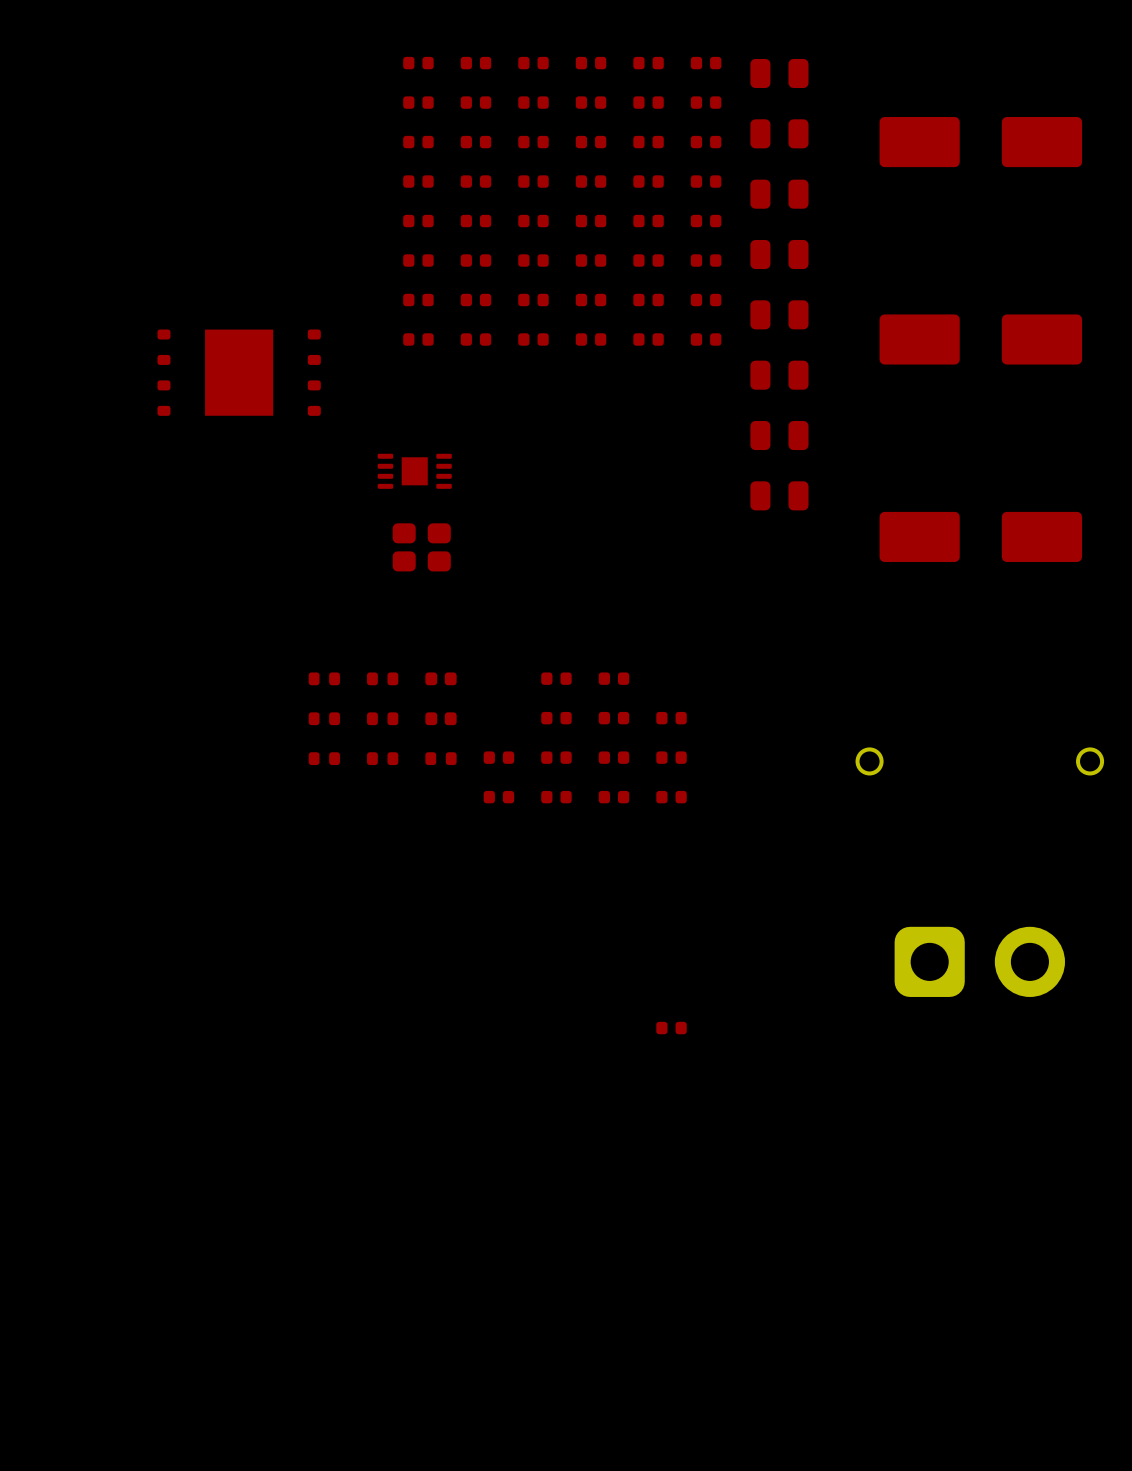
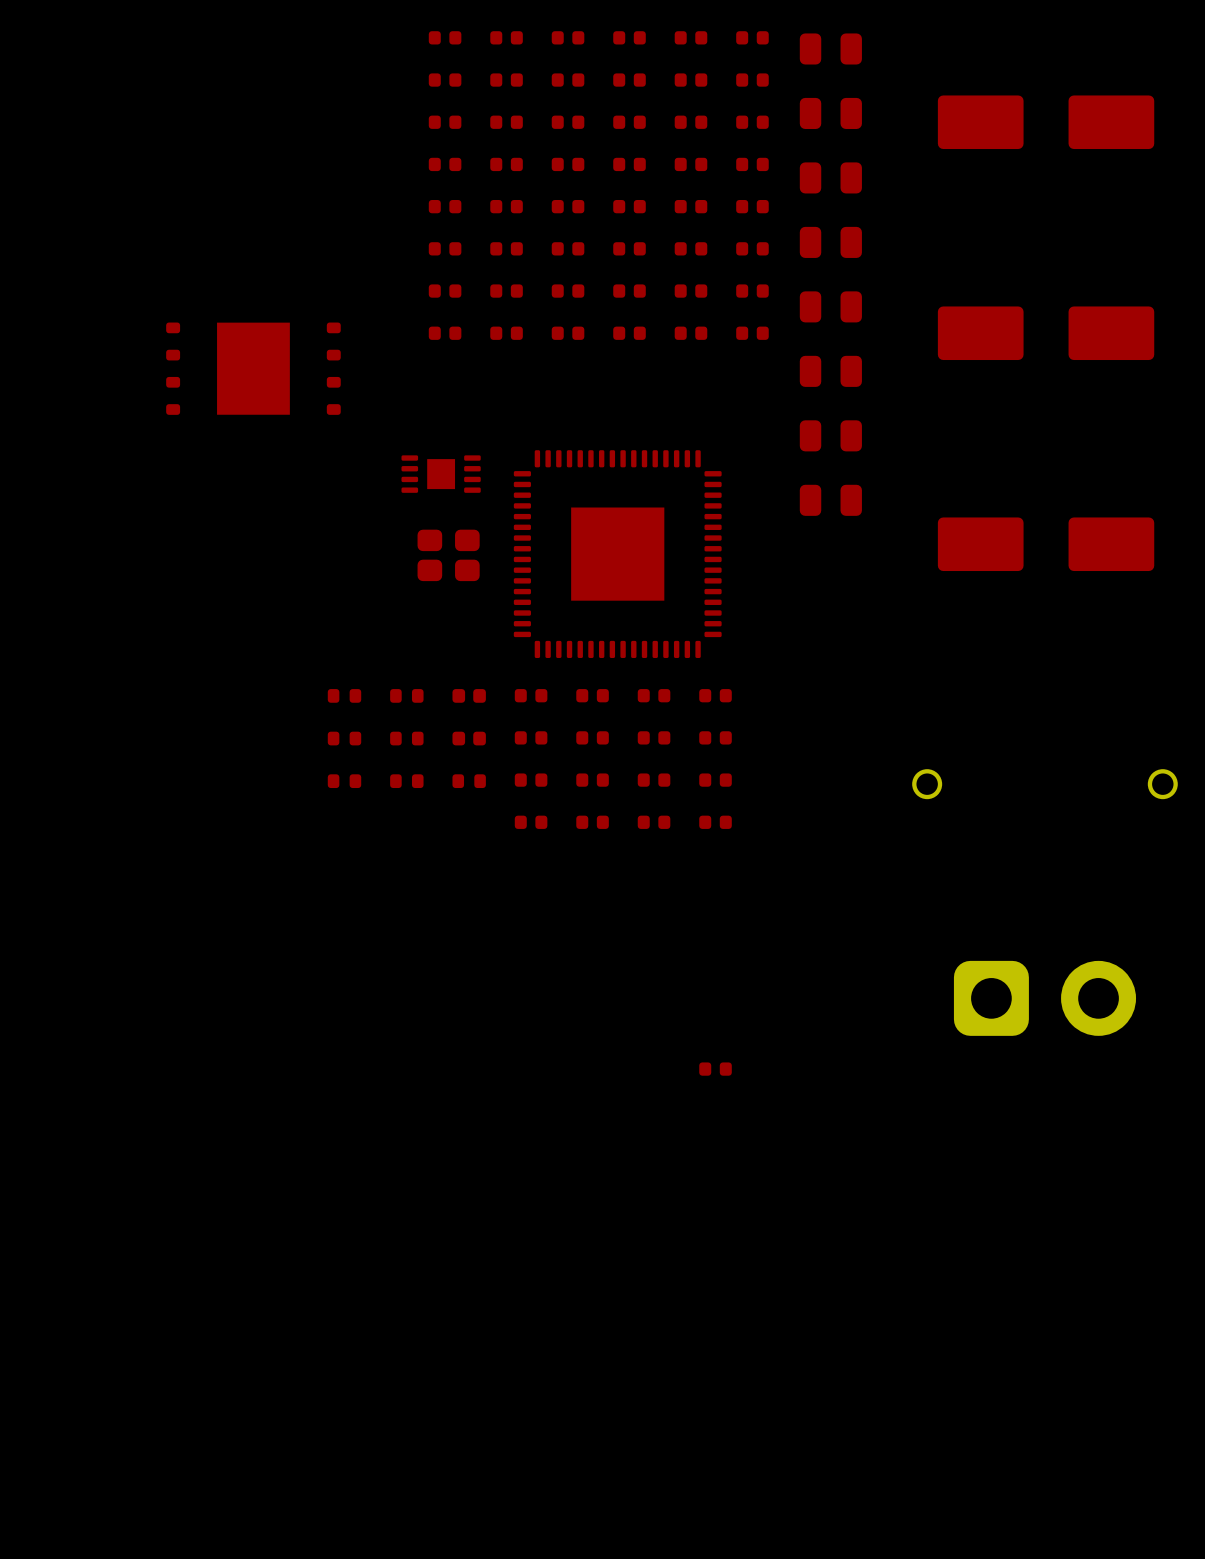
part: none -> (617, 554)
part: none -> (531, 695)
part: none -> (715, 695)
part: none -> (531, 737)

